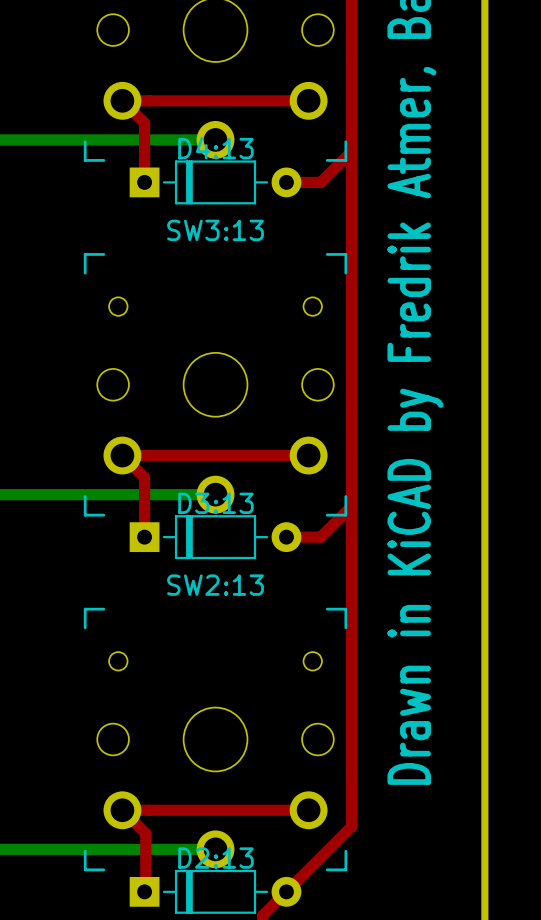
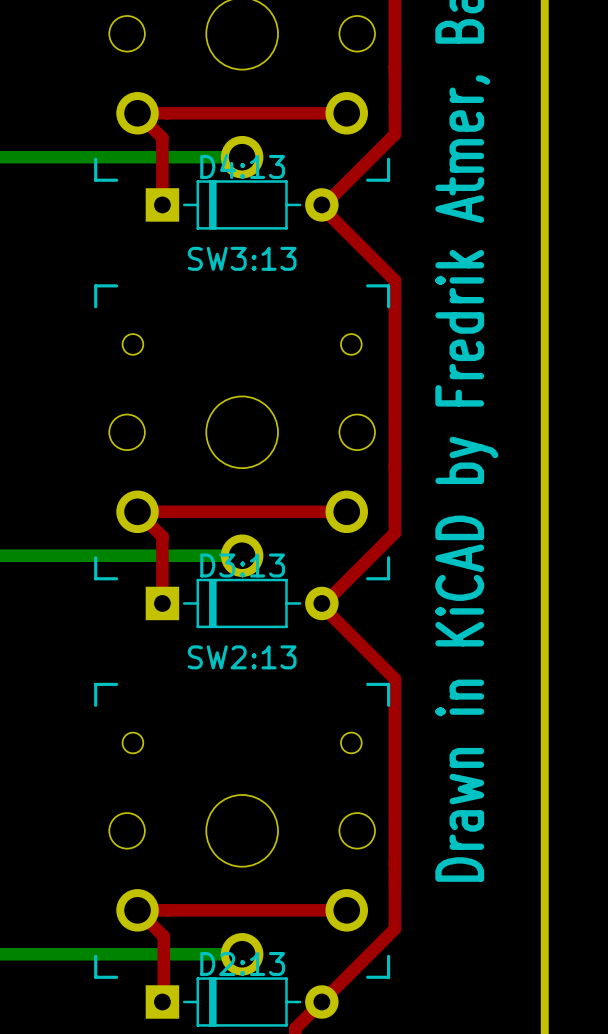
top track: (351, 66) (351, 249) -> (394, 134) (321, 207) (394, 280)
top track: (351, 119) (351, 151) (320, 182) (286, 182) -> none
top track: (351, 463) (351, 604) -> (394, 532) (321, 605) (394, 679)
top track: (351, 474) (351, 506) (320, 537) (286, 537) -> none

